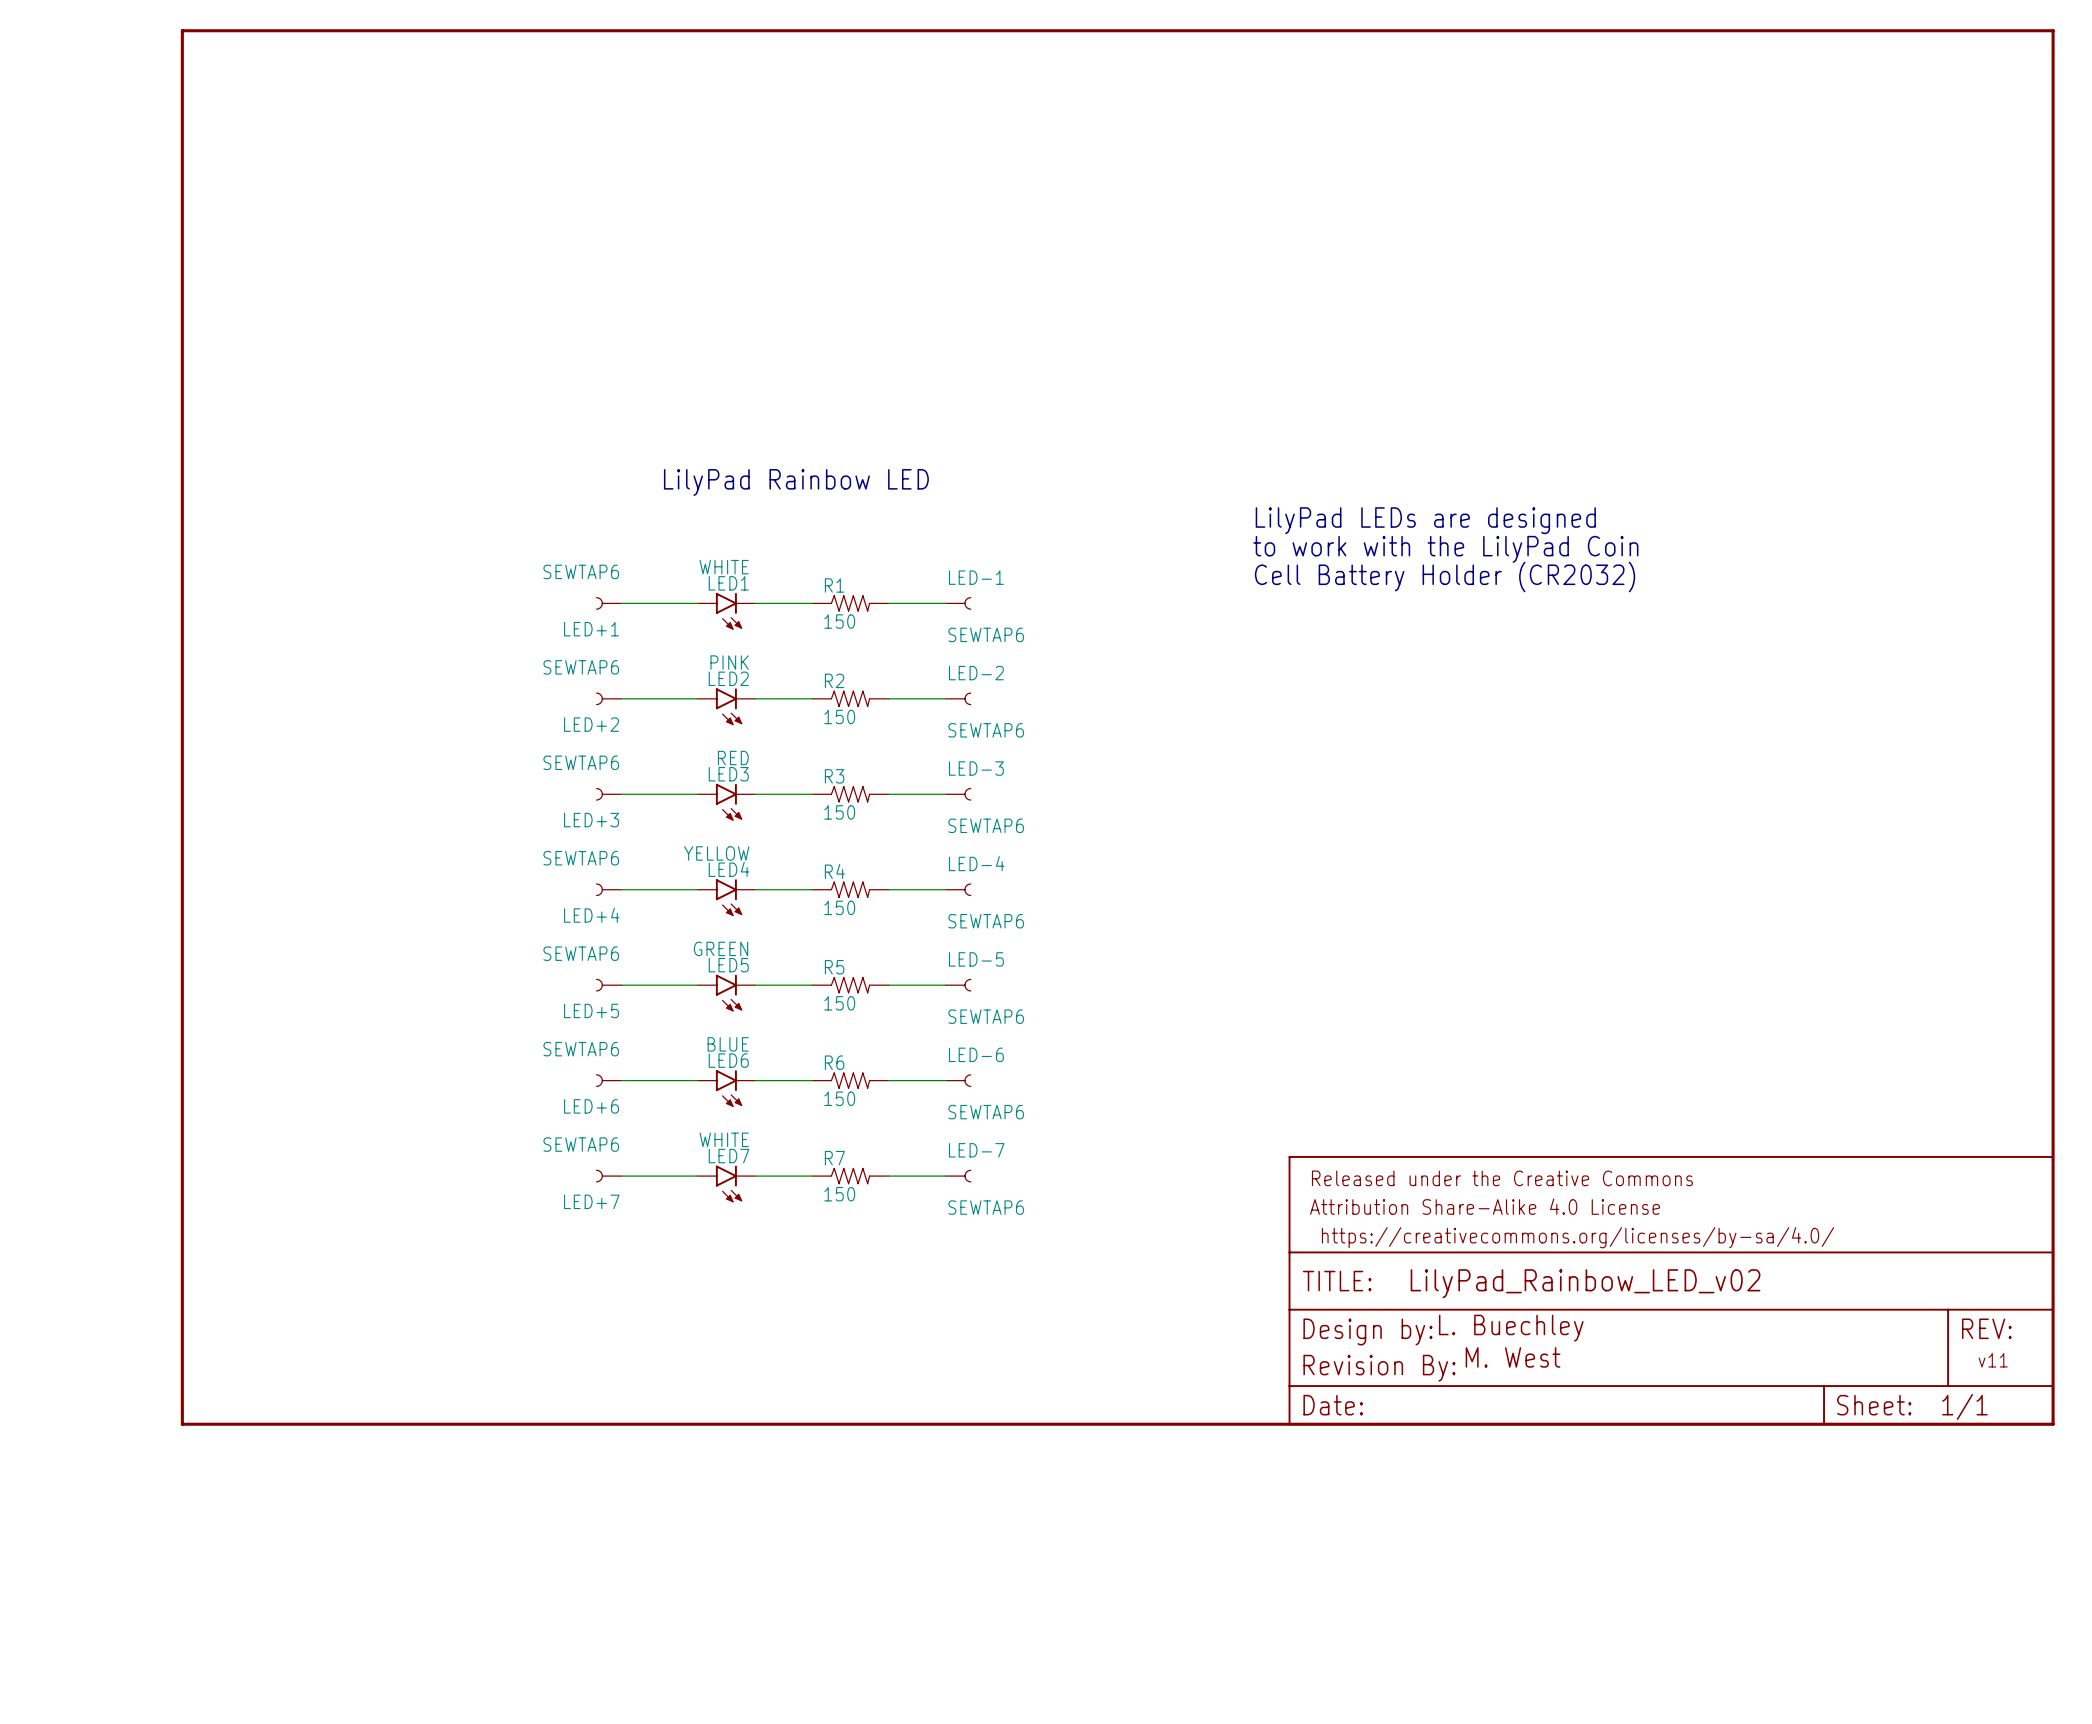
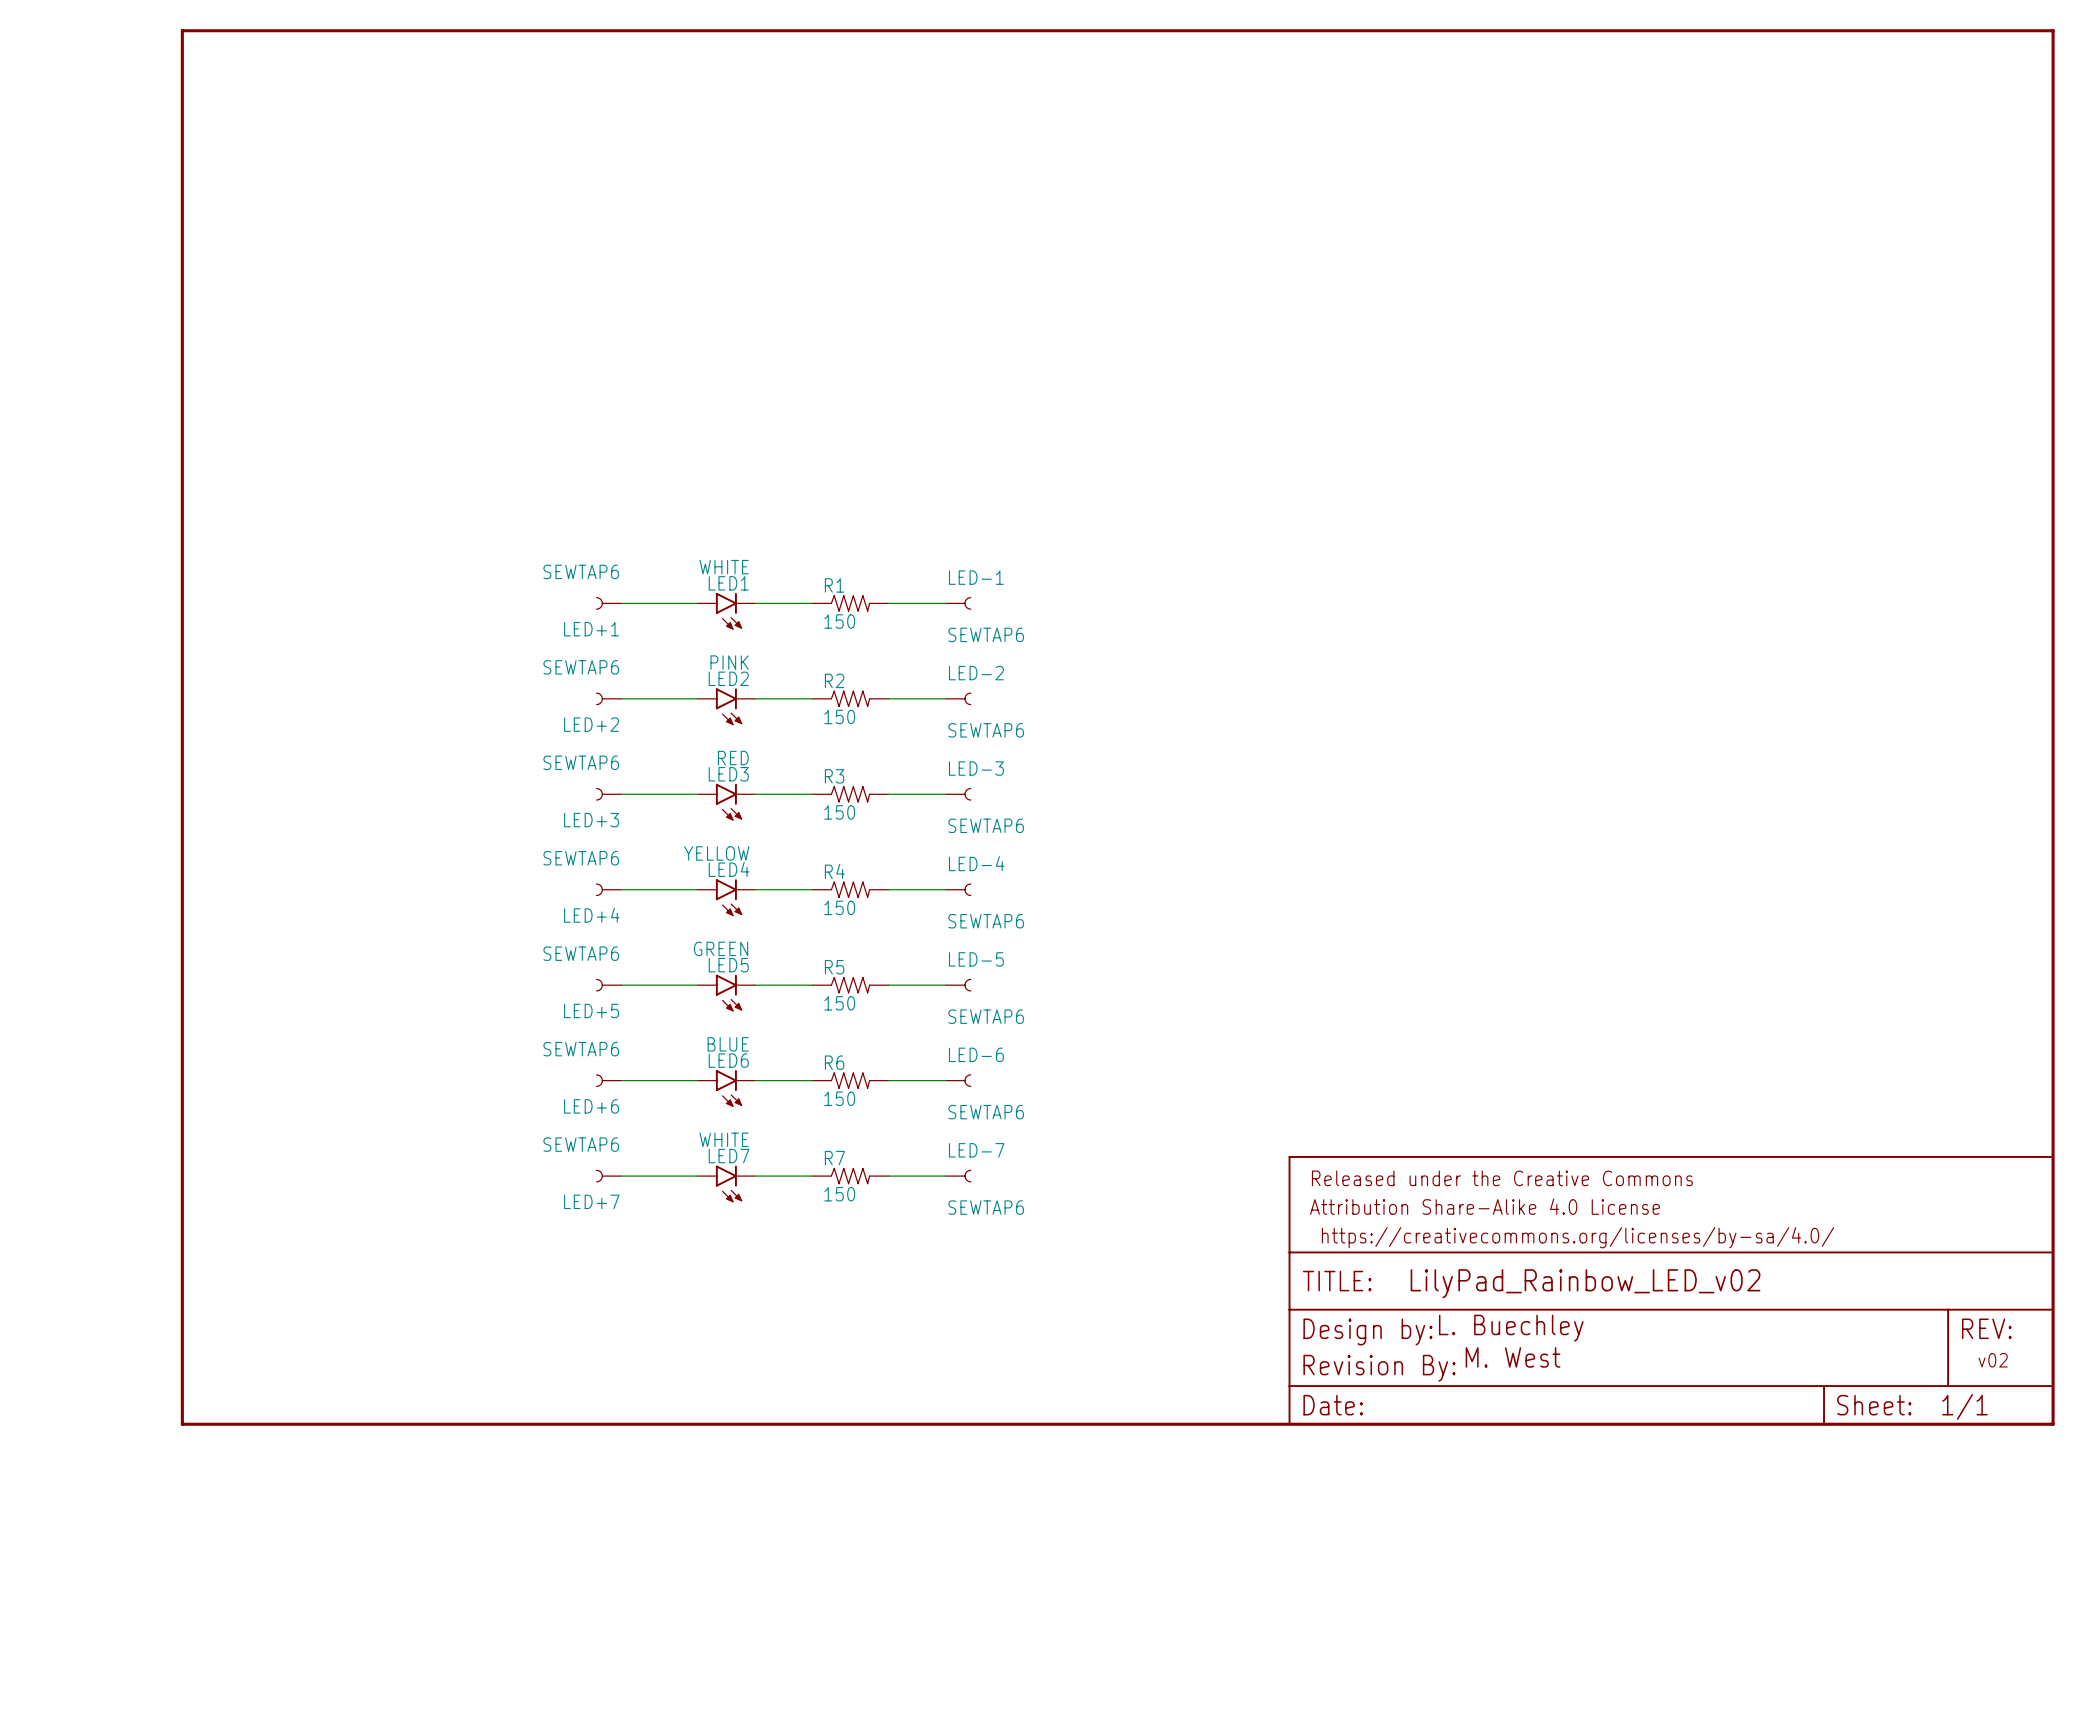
text: LilyPad Rainbow LED (796, 482) -> none
text: LilyPad LEDs are designed (1425, 520) -> none
text: to work with the LilyPad Coin (1445, 549) -> none
text: Cell Battery Holder (CR2032) (1445, 577) -> none
text: v11 (1993, 1360) -> v02 (1993, 1360)

